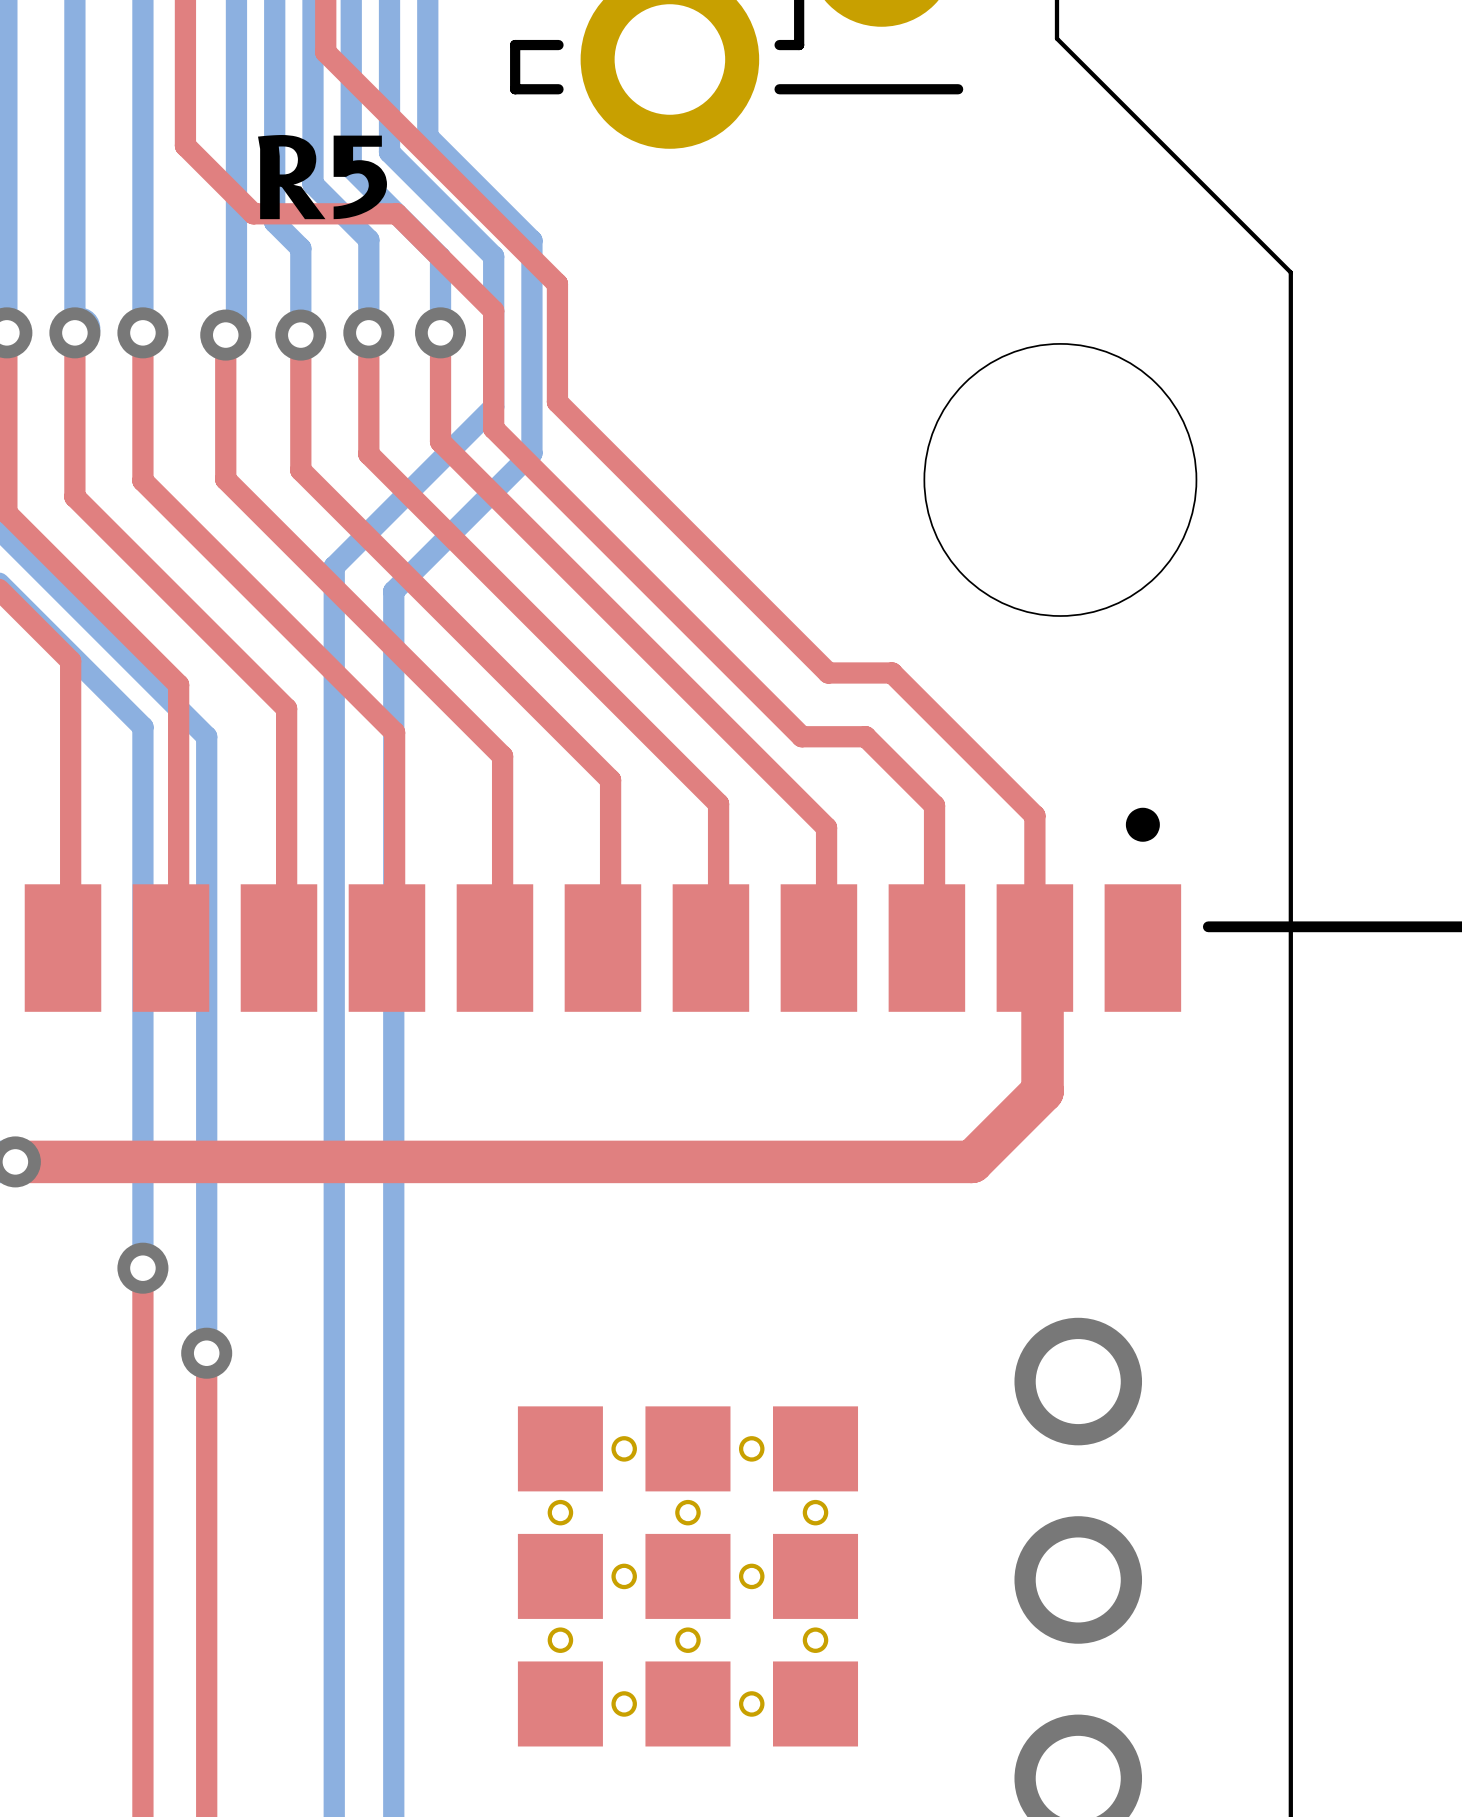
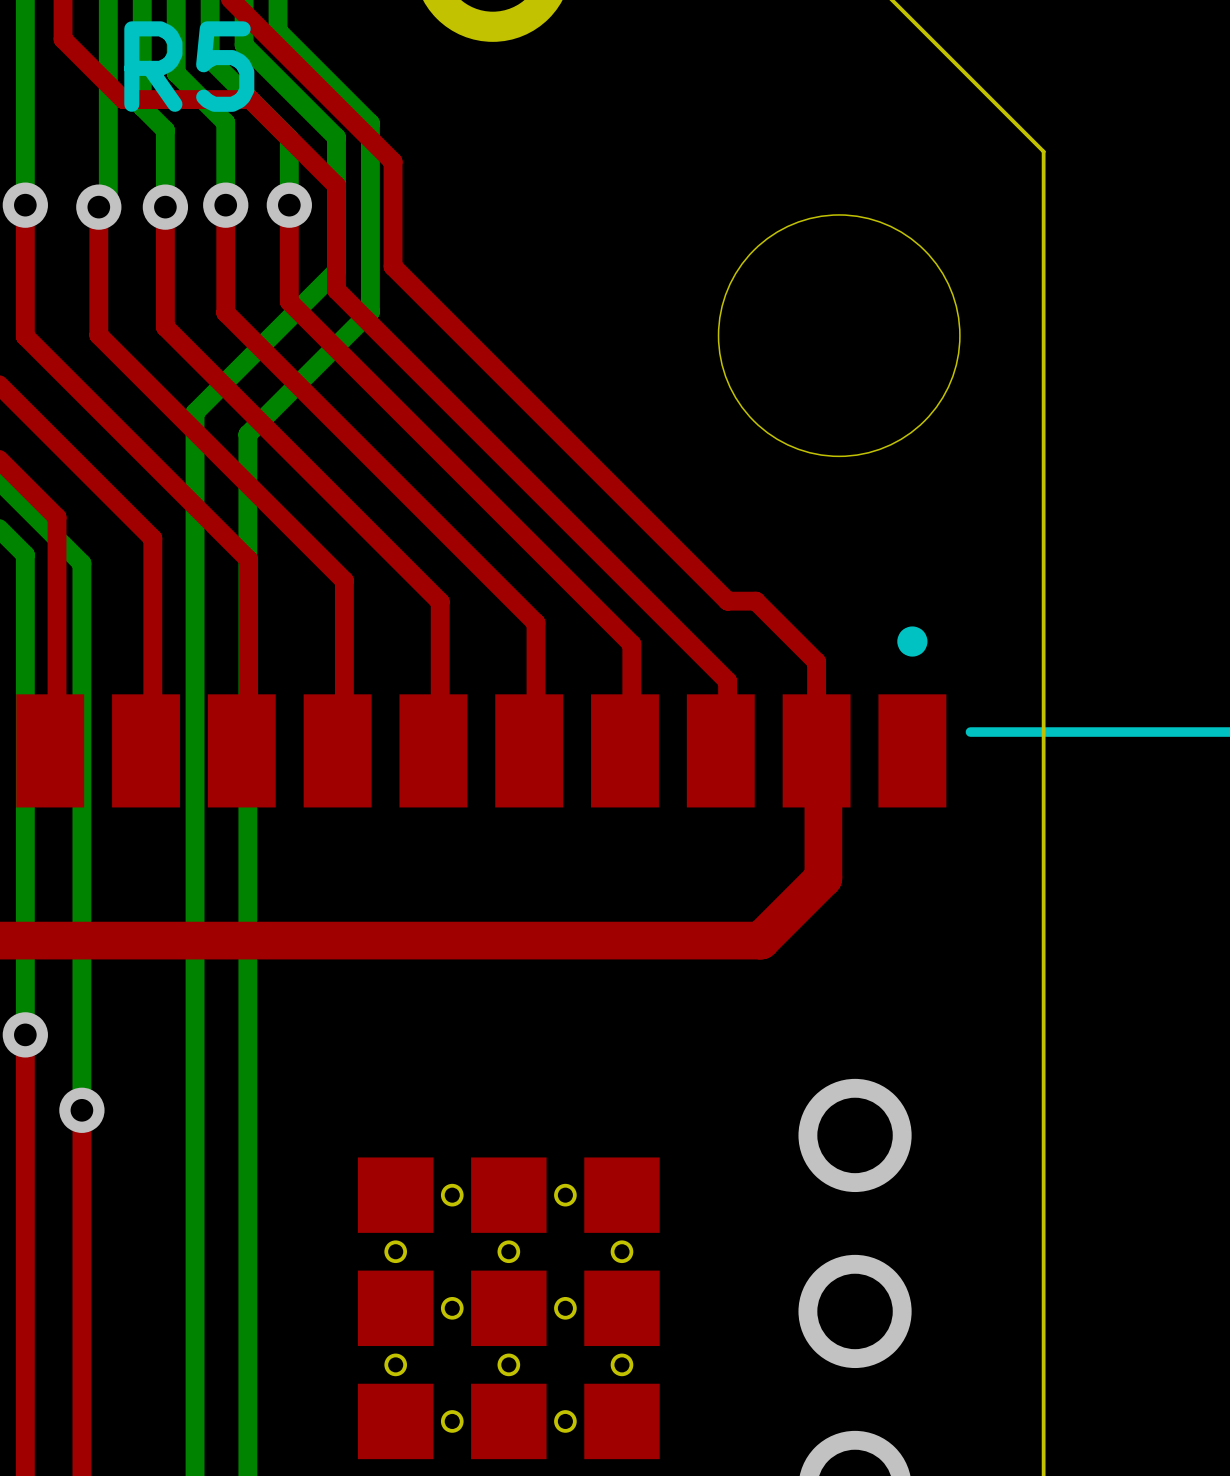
top track: (828, 672) (892, 672) (1034, 815) (1034, 847) -> (633, 506) (727, 601) (755, 601) (816, 661)
top track: (801, 736) (865, 736) (934, 805) (934, 869) -> (609, 563) (727, 681)

